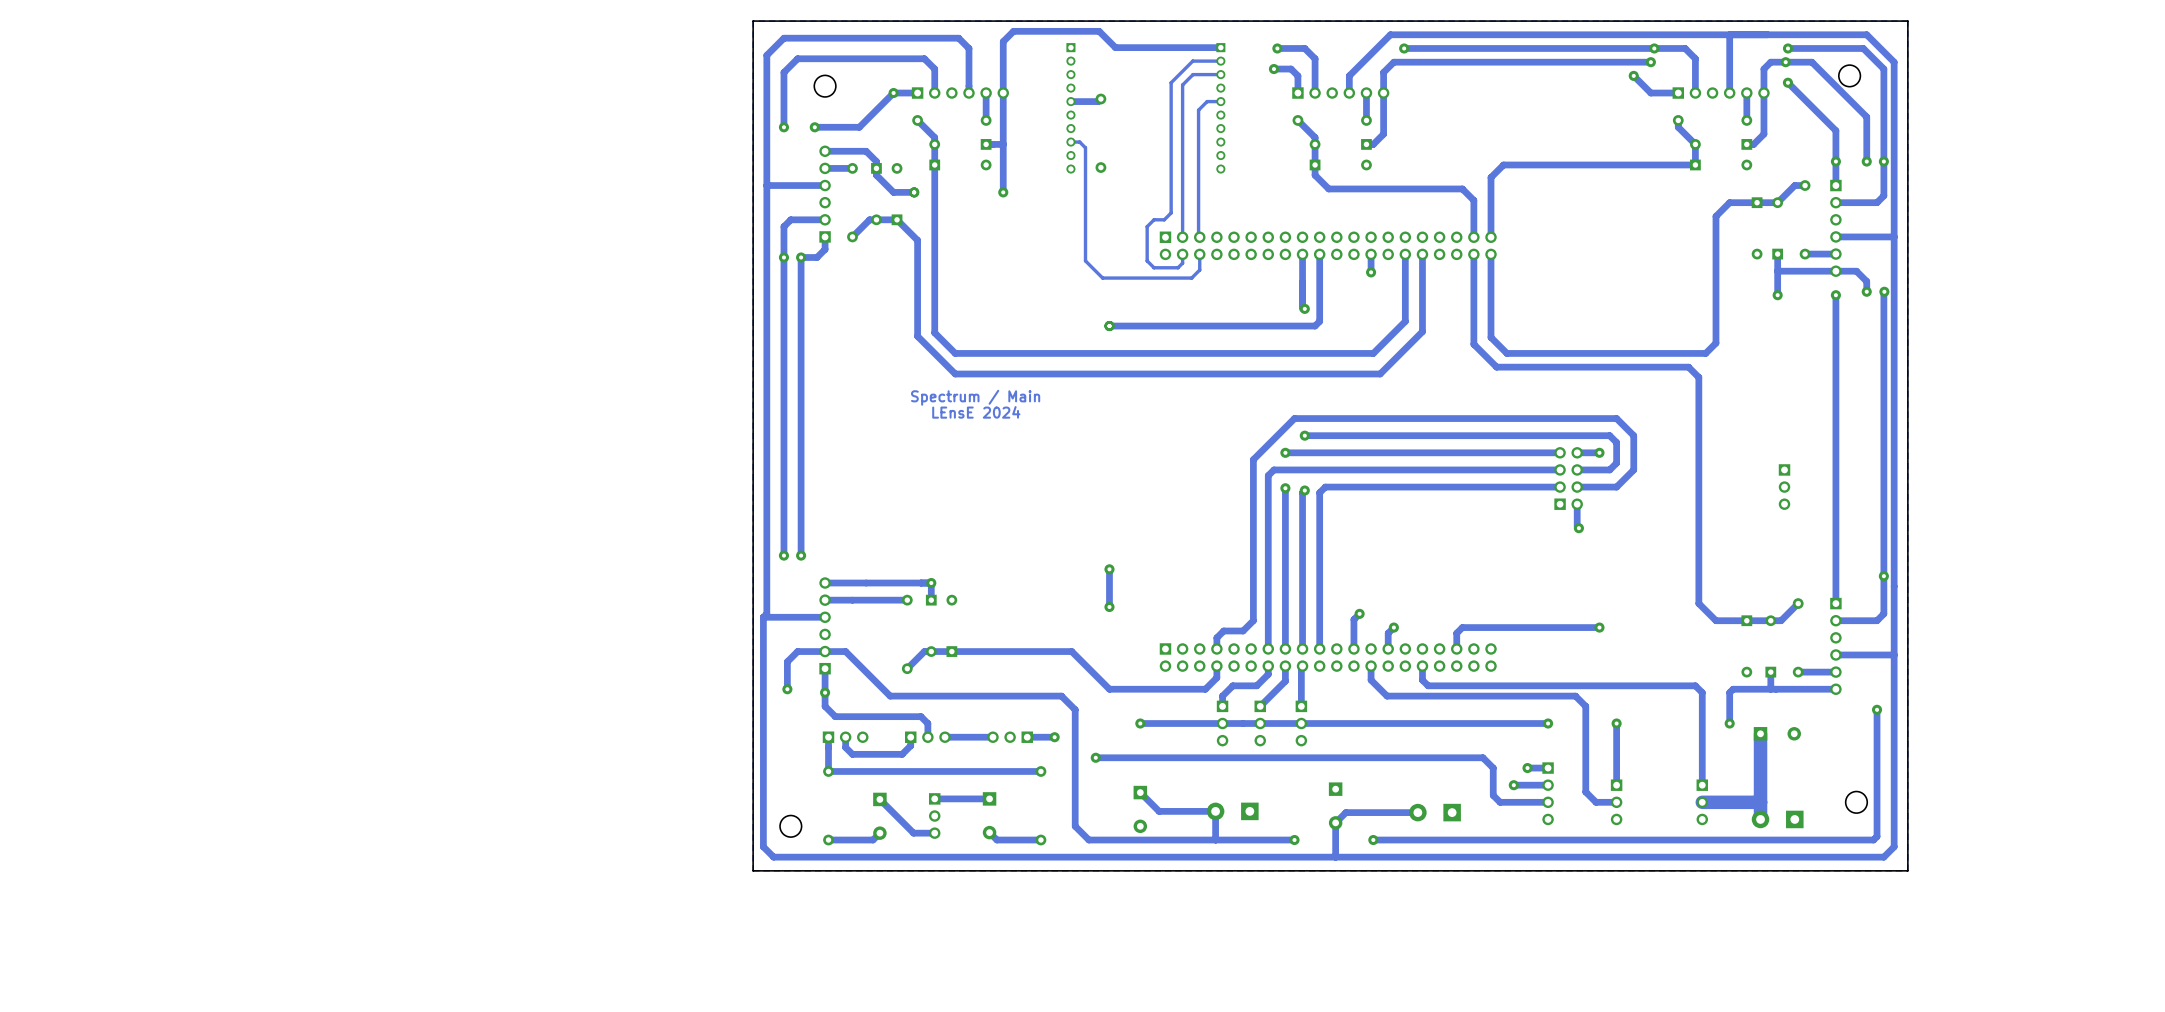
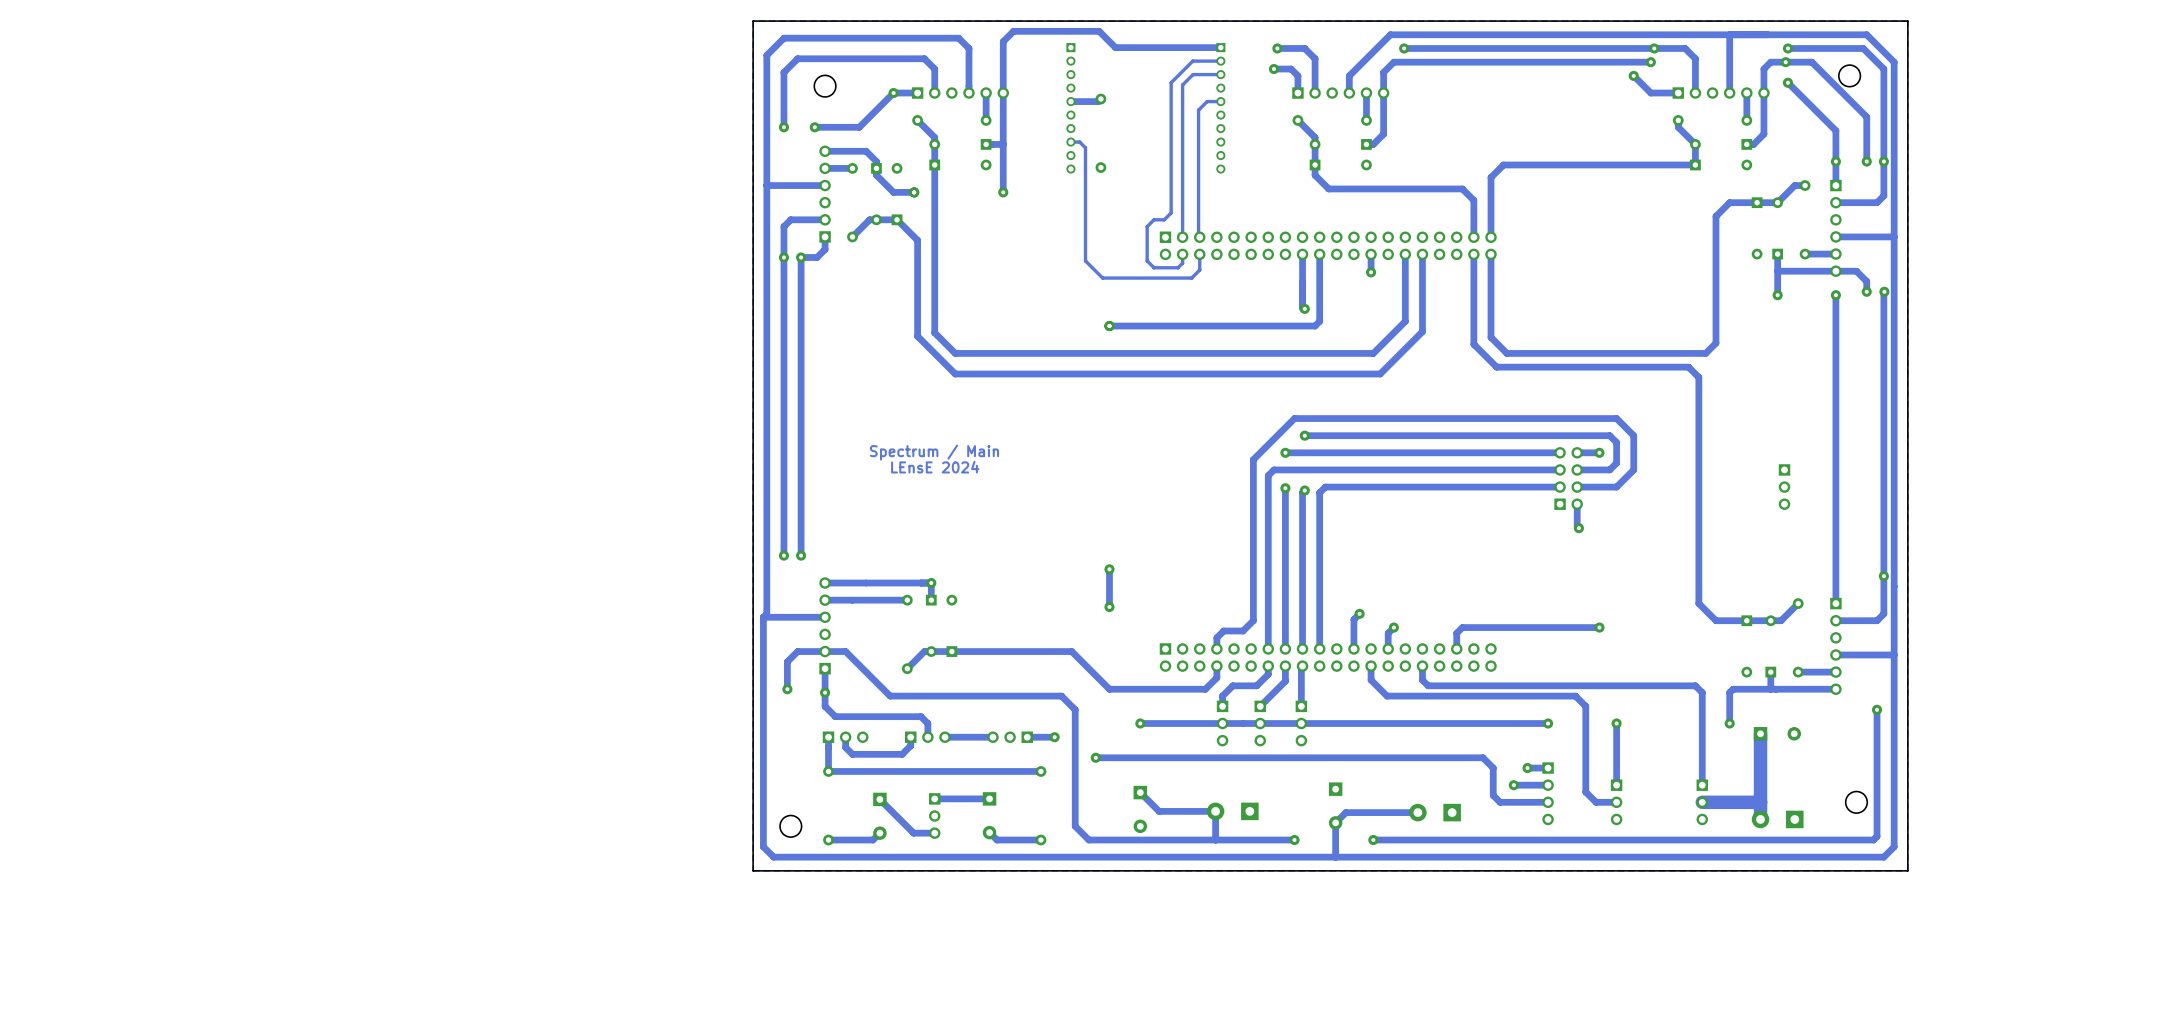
text position: Spectrum / Main (975, 397) -> Spectrum / Main (934, 452)
text position: LEnsE 2024 (976, 412) -> LEnsE 2024 (935, 467)

